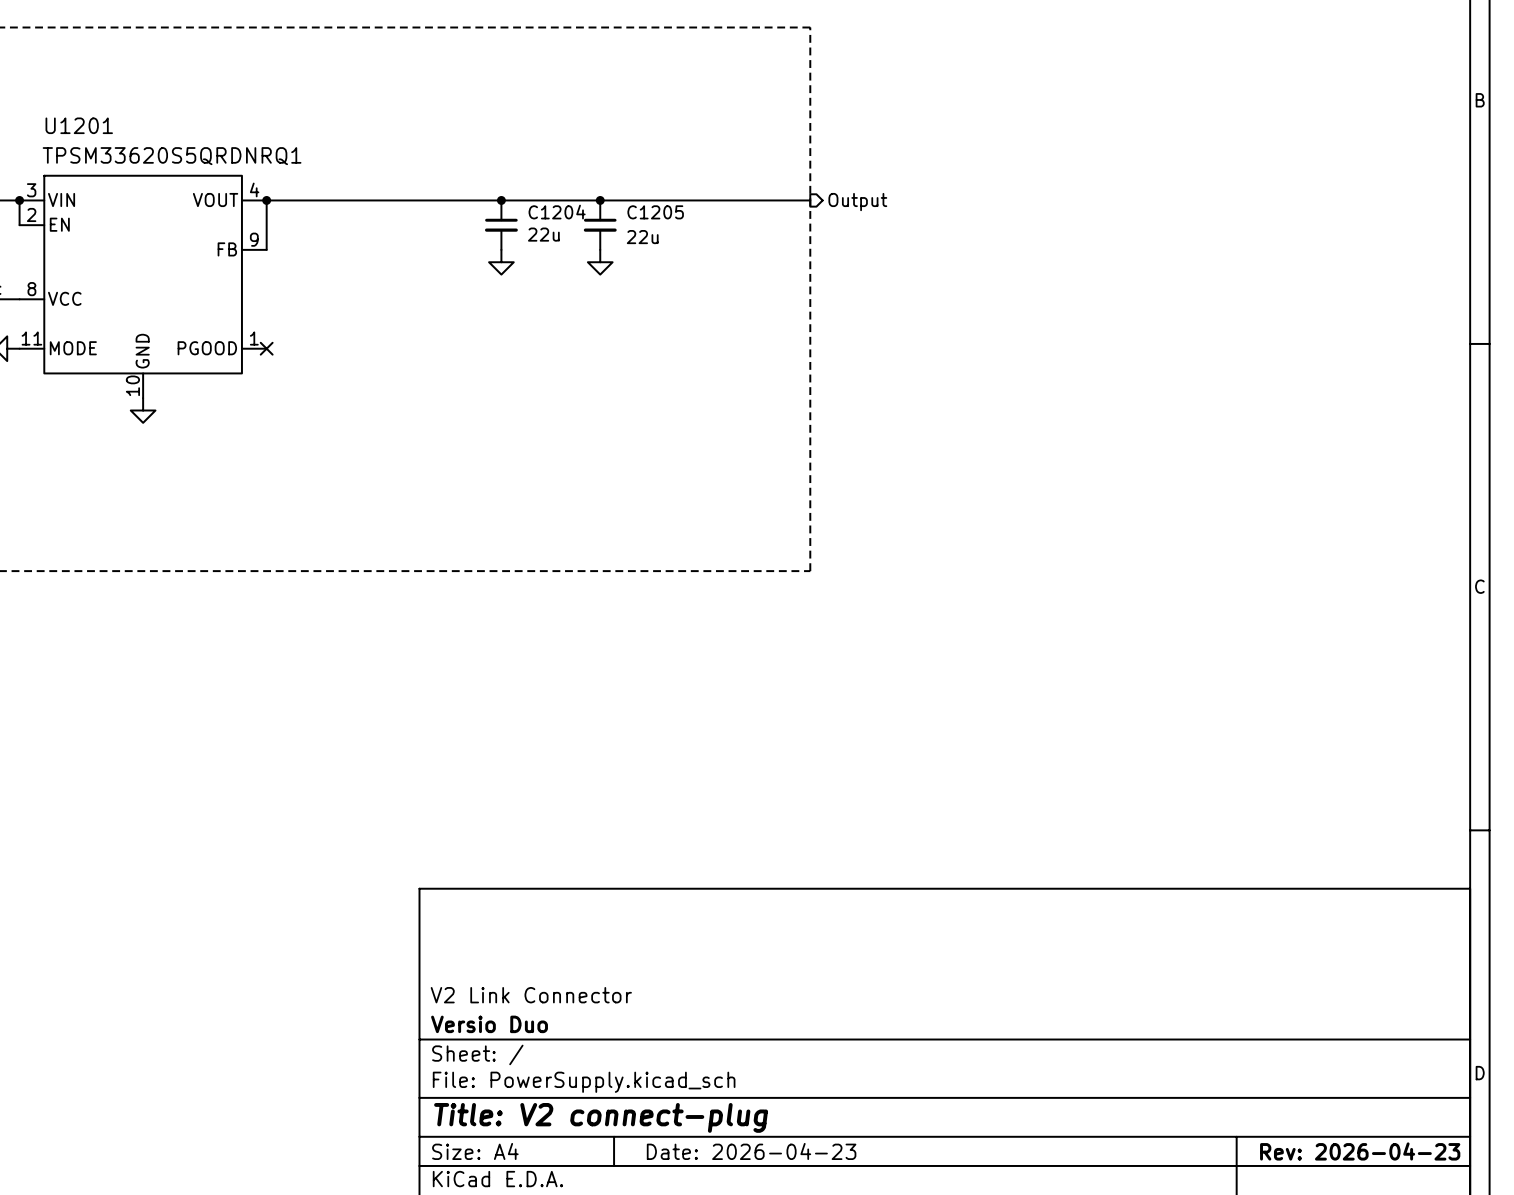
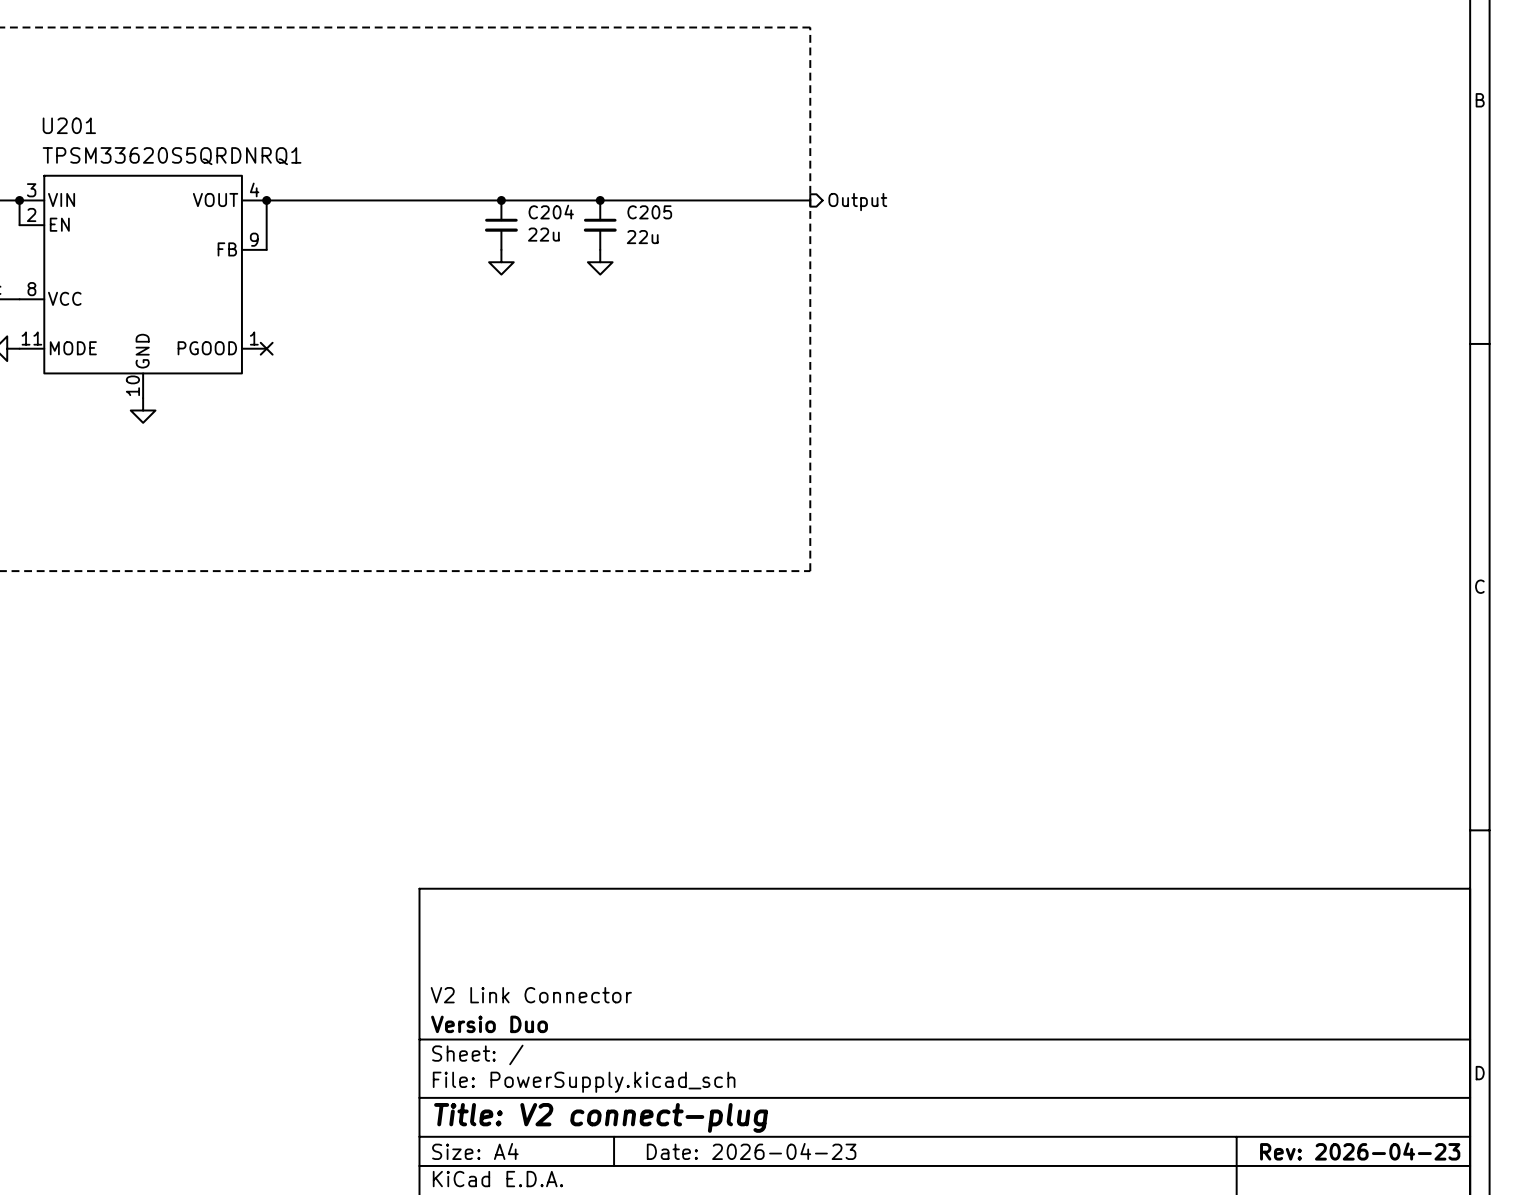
U1201 name: U1201 (79, 125) -> U201 (69, 125)
C1204 name: C1204 (557, 212) -> C204 (551, 212)
C1205 name: C1205 (655, 212) -> C205 (649, 212)

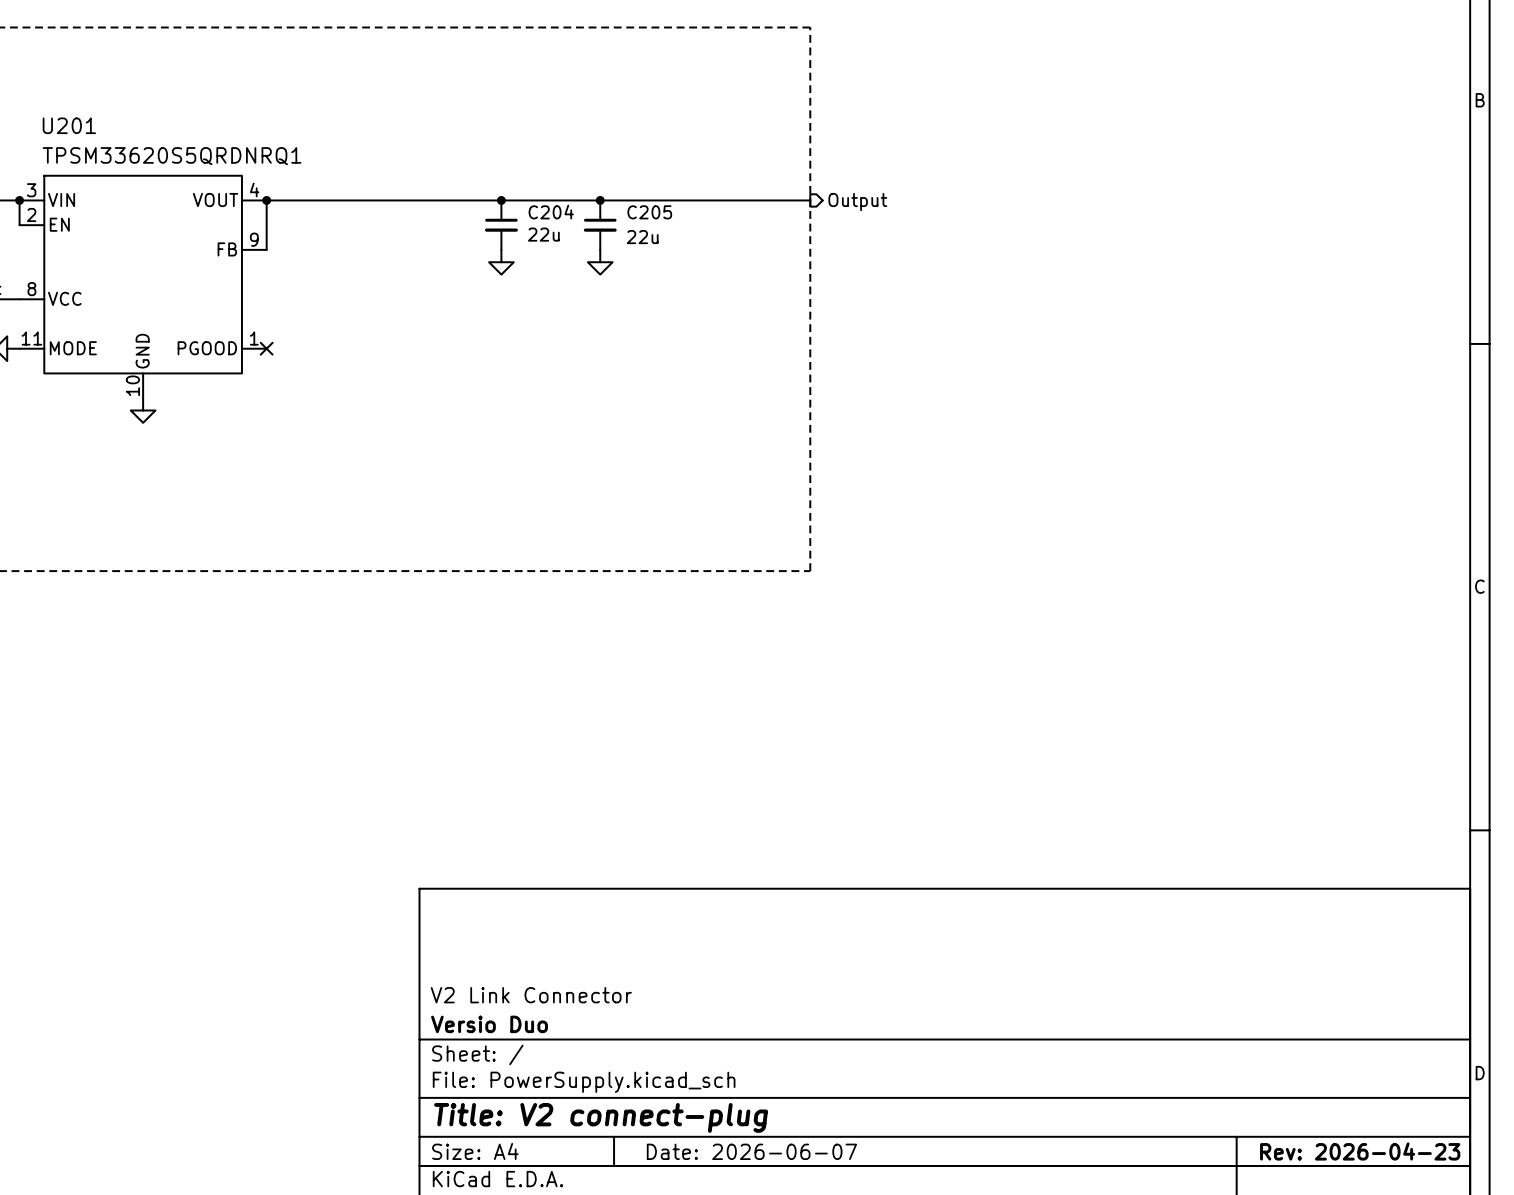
title block: Date: 2026-04-23 (751, 1151) -> Date: 2026-06-07 (751, 1151)

